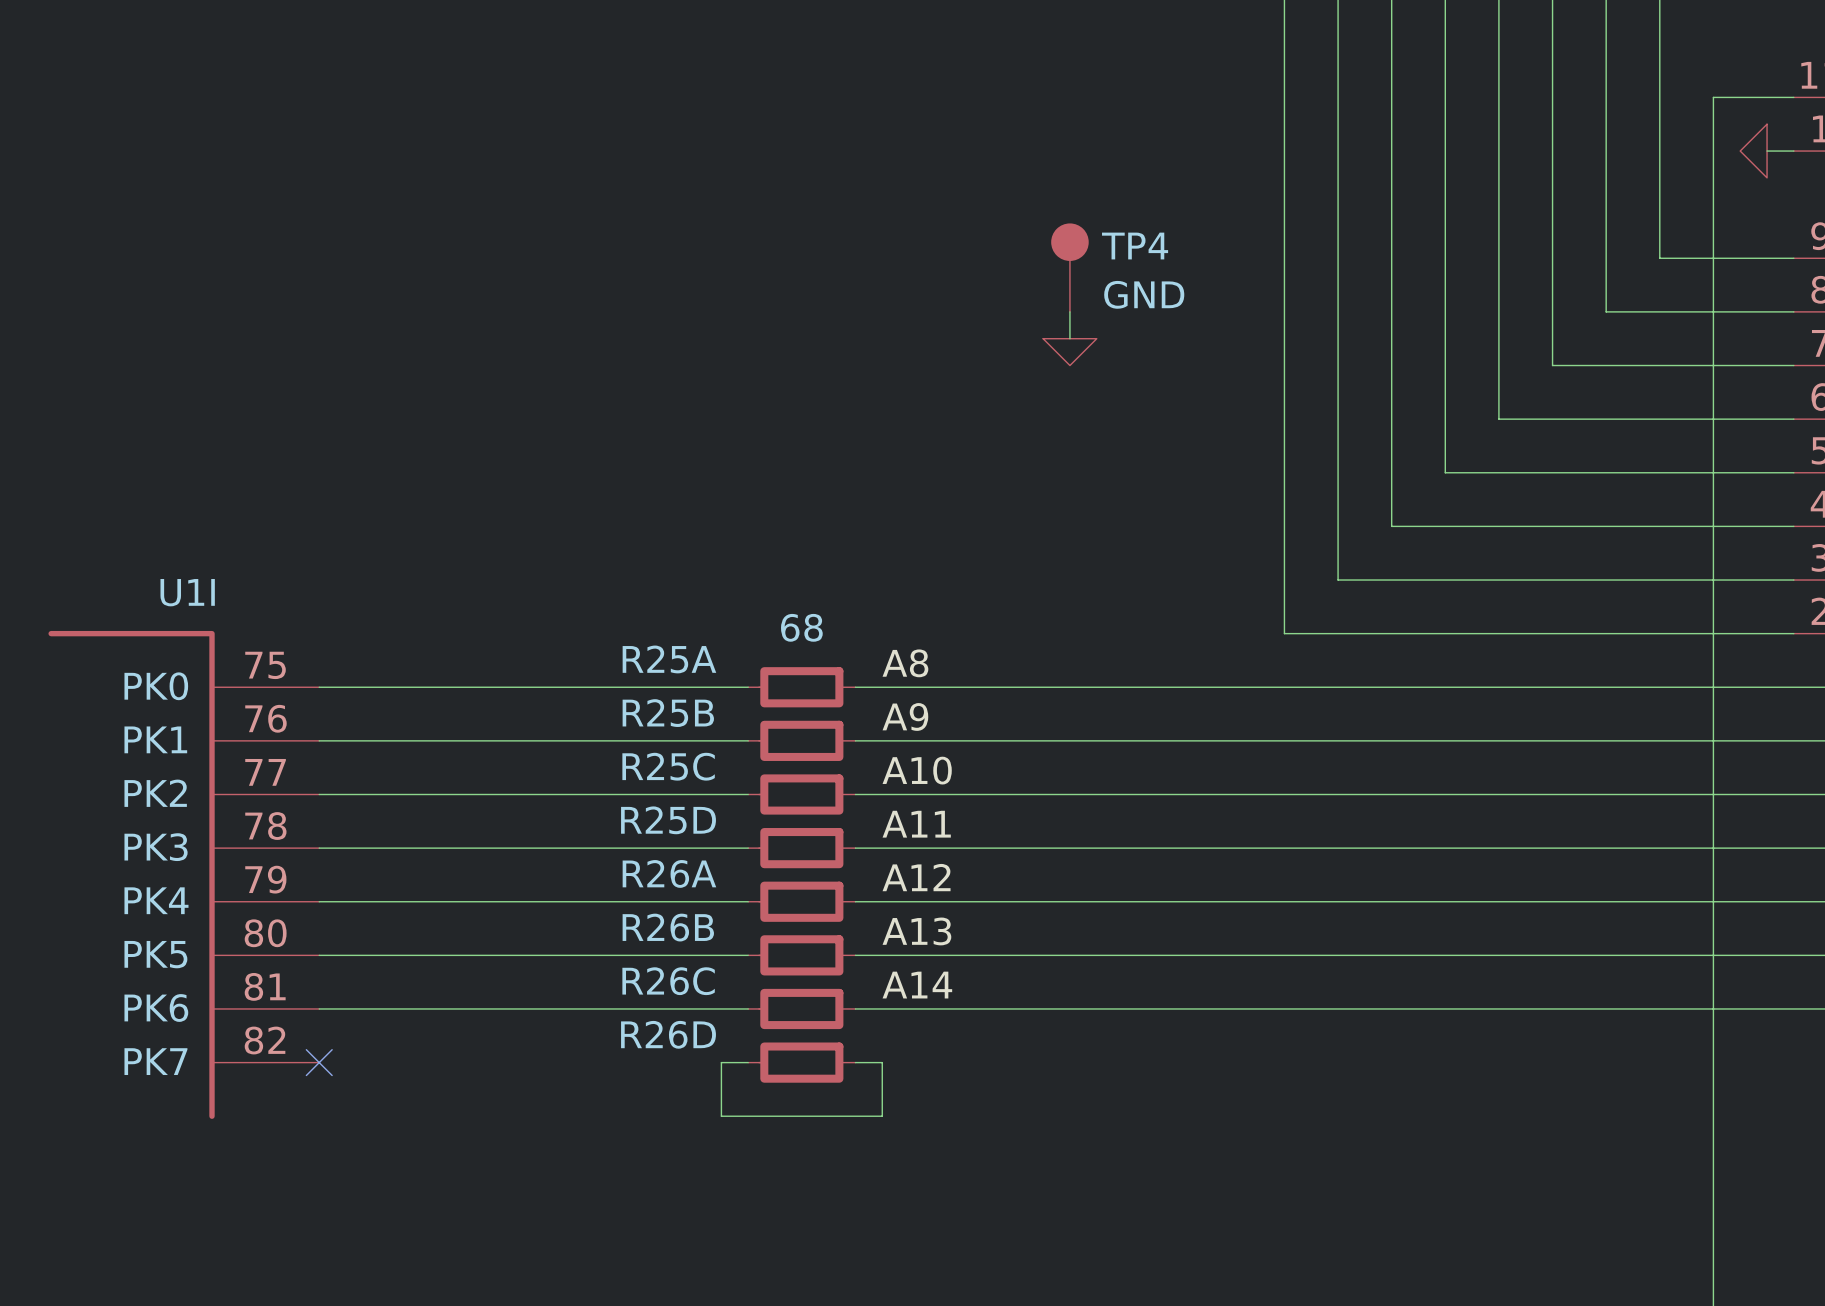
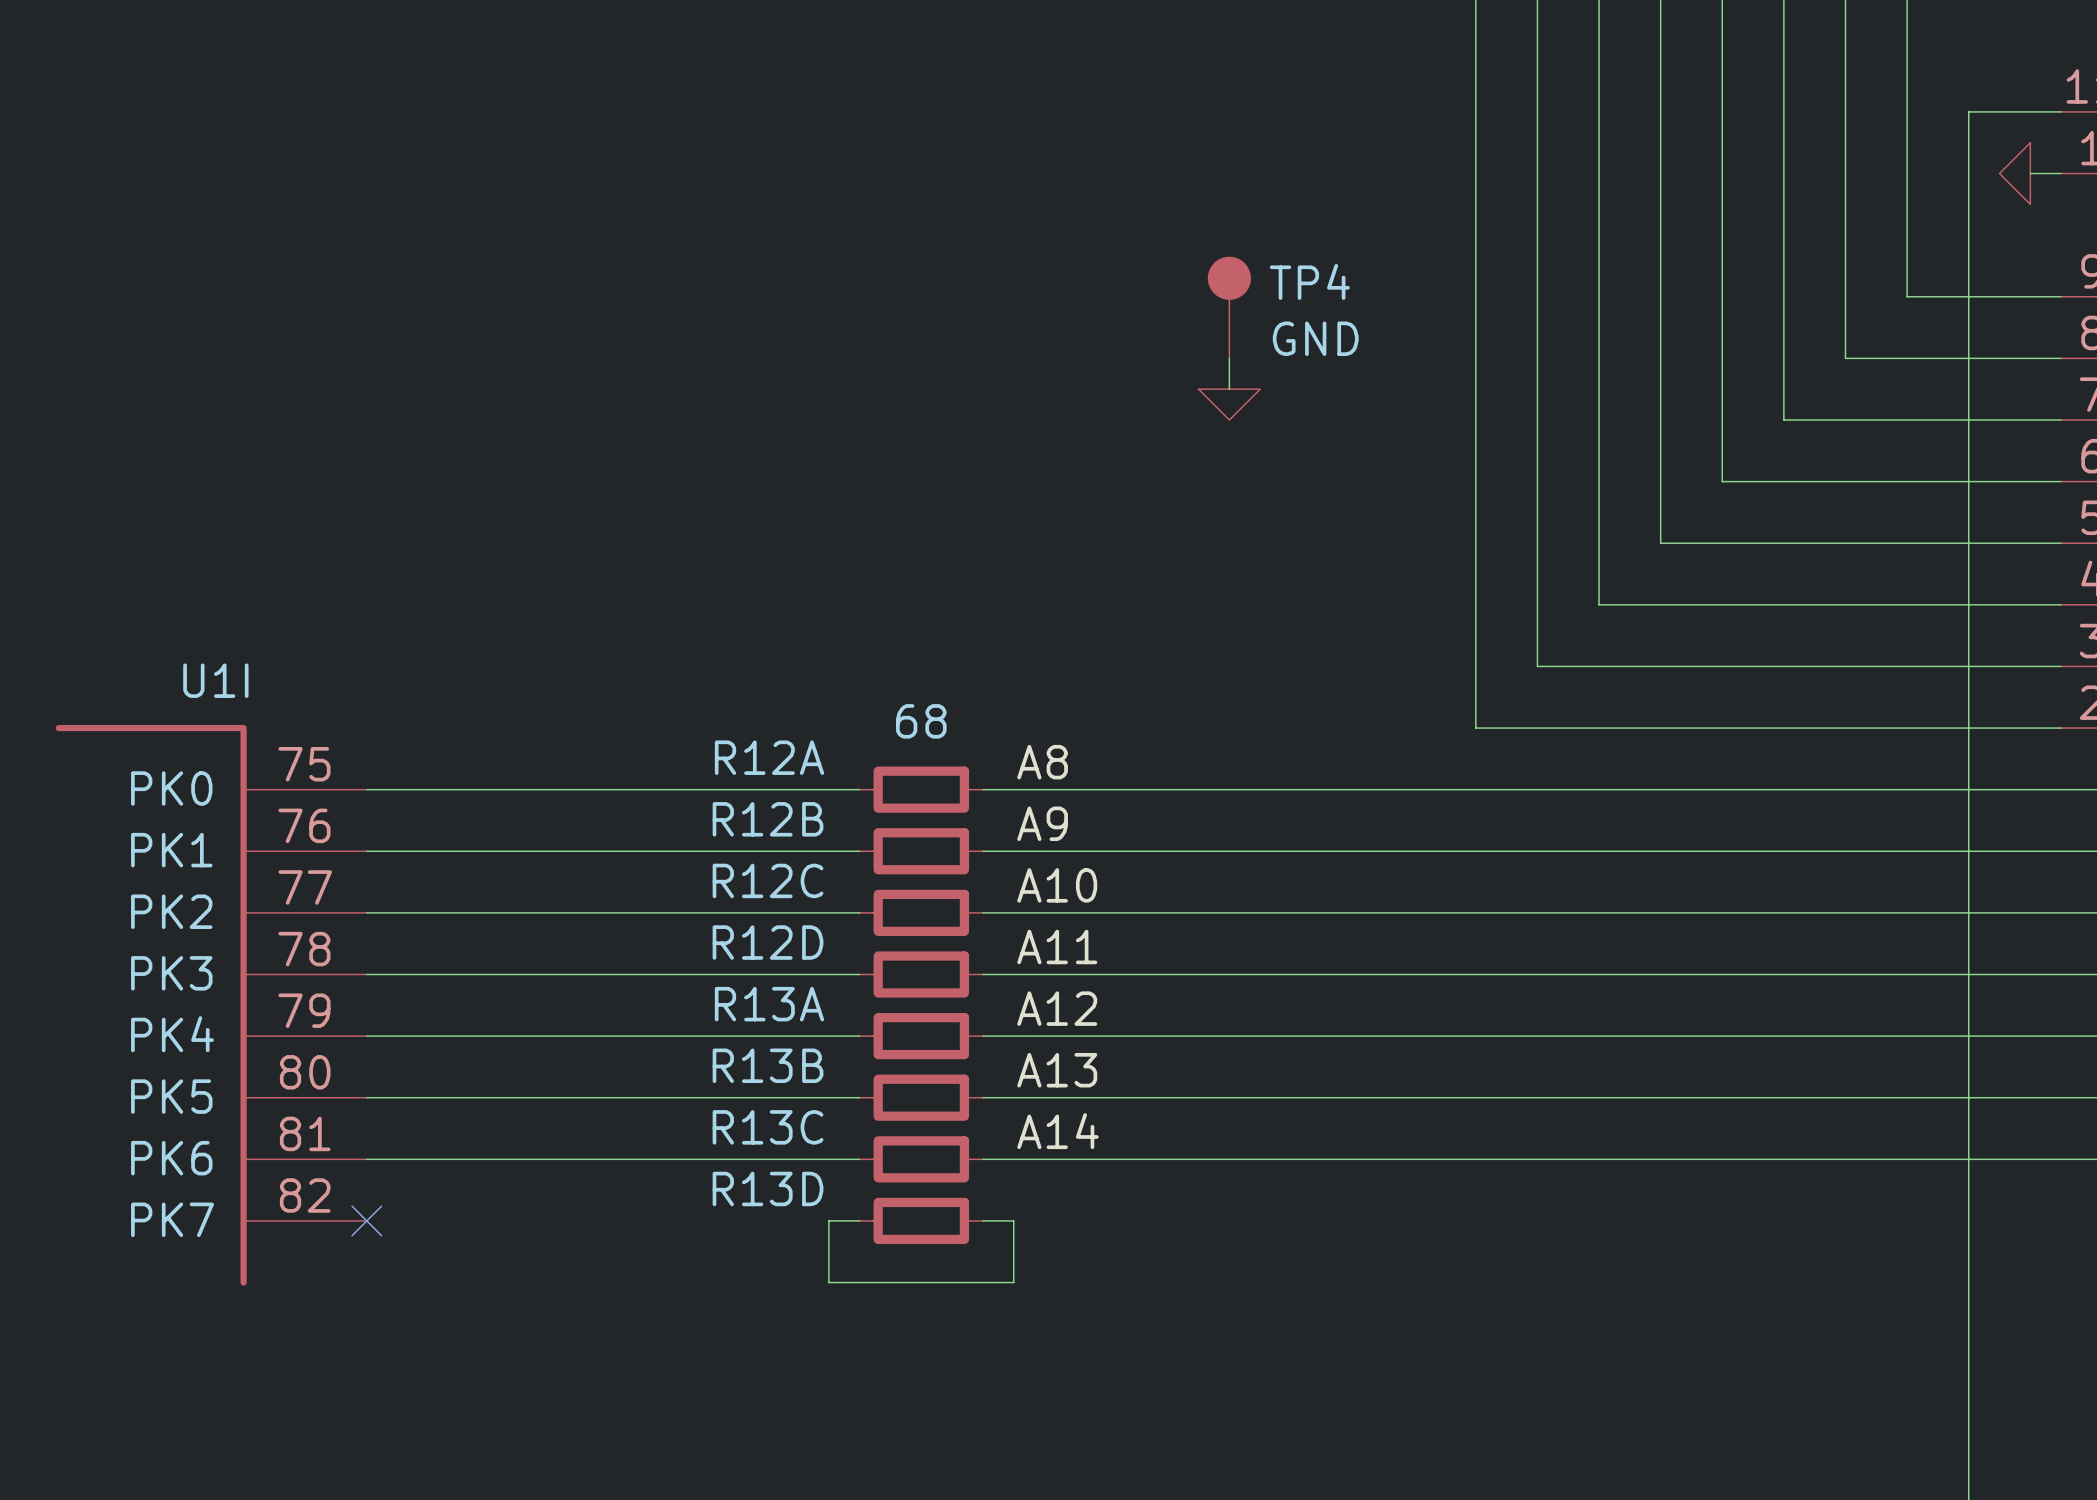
R25A name: R25A (669, 659) -> R12A (769, 757)
R25B name: R25B (668, 713) -> R12B (768, 819)
R25C name: R25C (668, 766) -> R12C (768, 880)
R25D name: R25D (668, 820) -> R12D (768, 942)
R26A name: R26A (669, 873) -> R13A (769, 1004)
R26B name: R26B (668, 927) -> R13B (768, 1065)
R26C name: R26C (668, 981) -> R13C (768, 1127)
R26D name: R26D (668, 1034) -> R13D (768, 1188)

